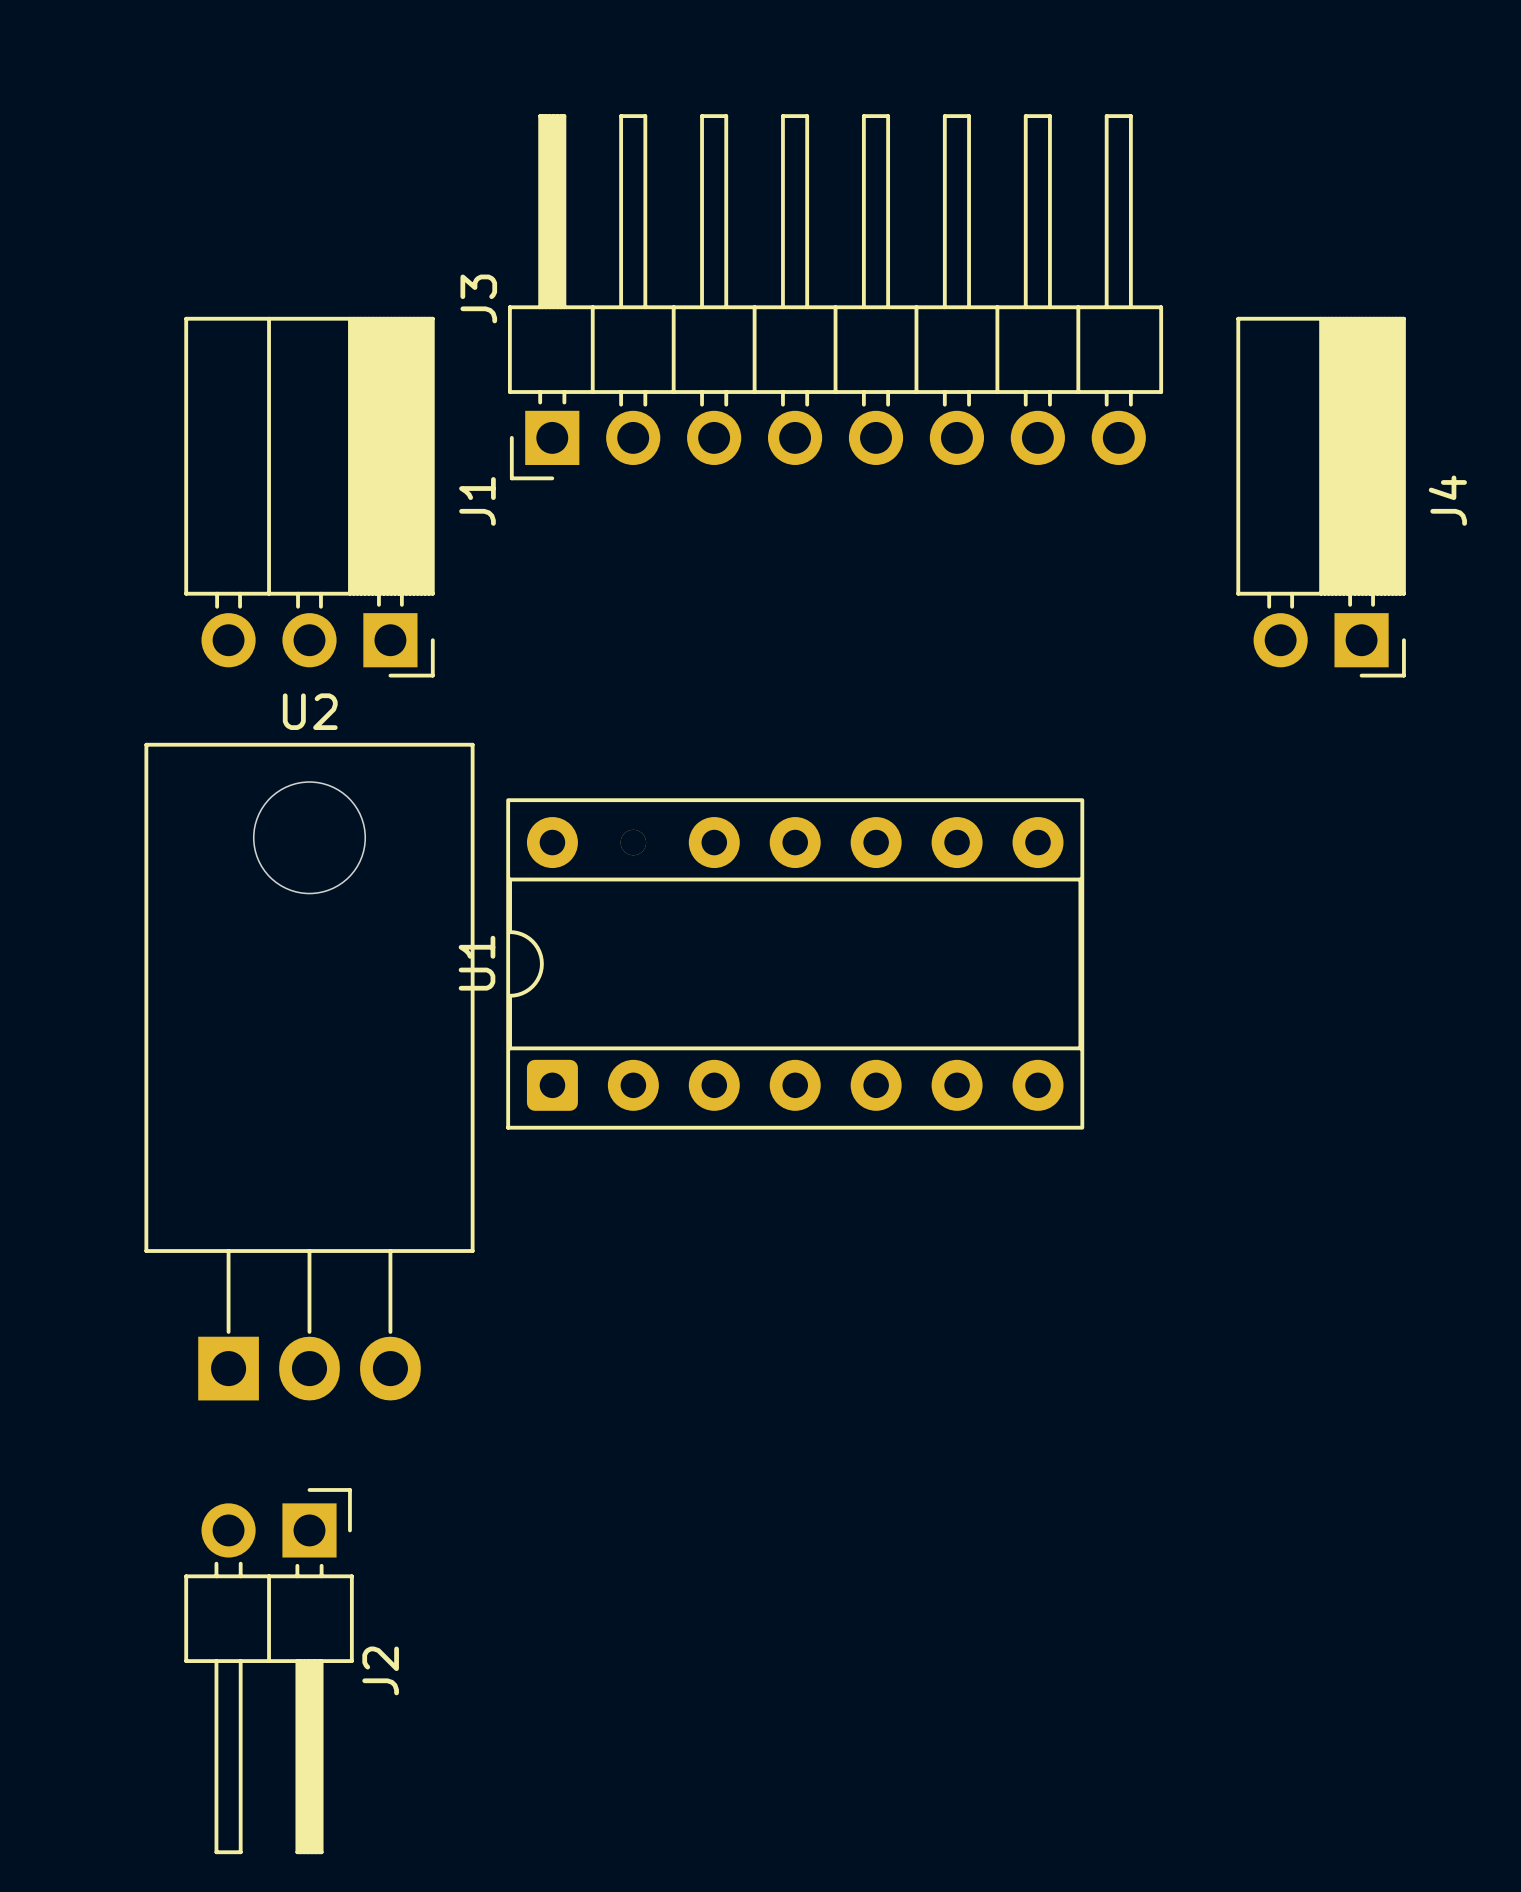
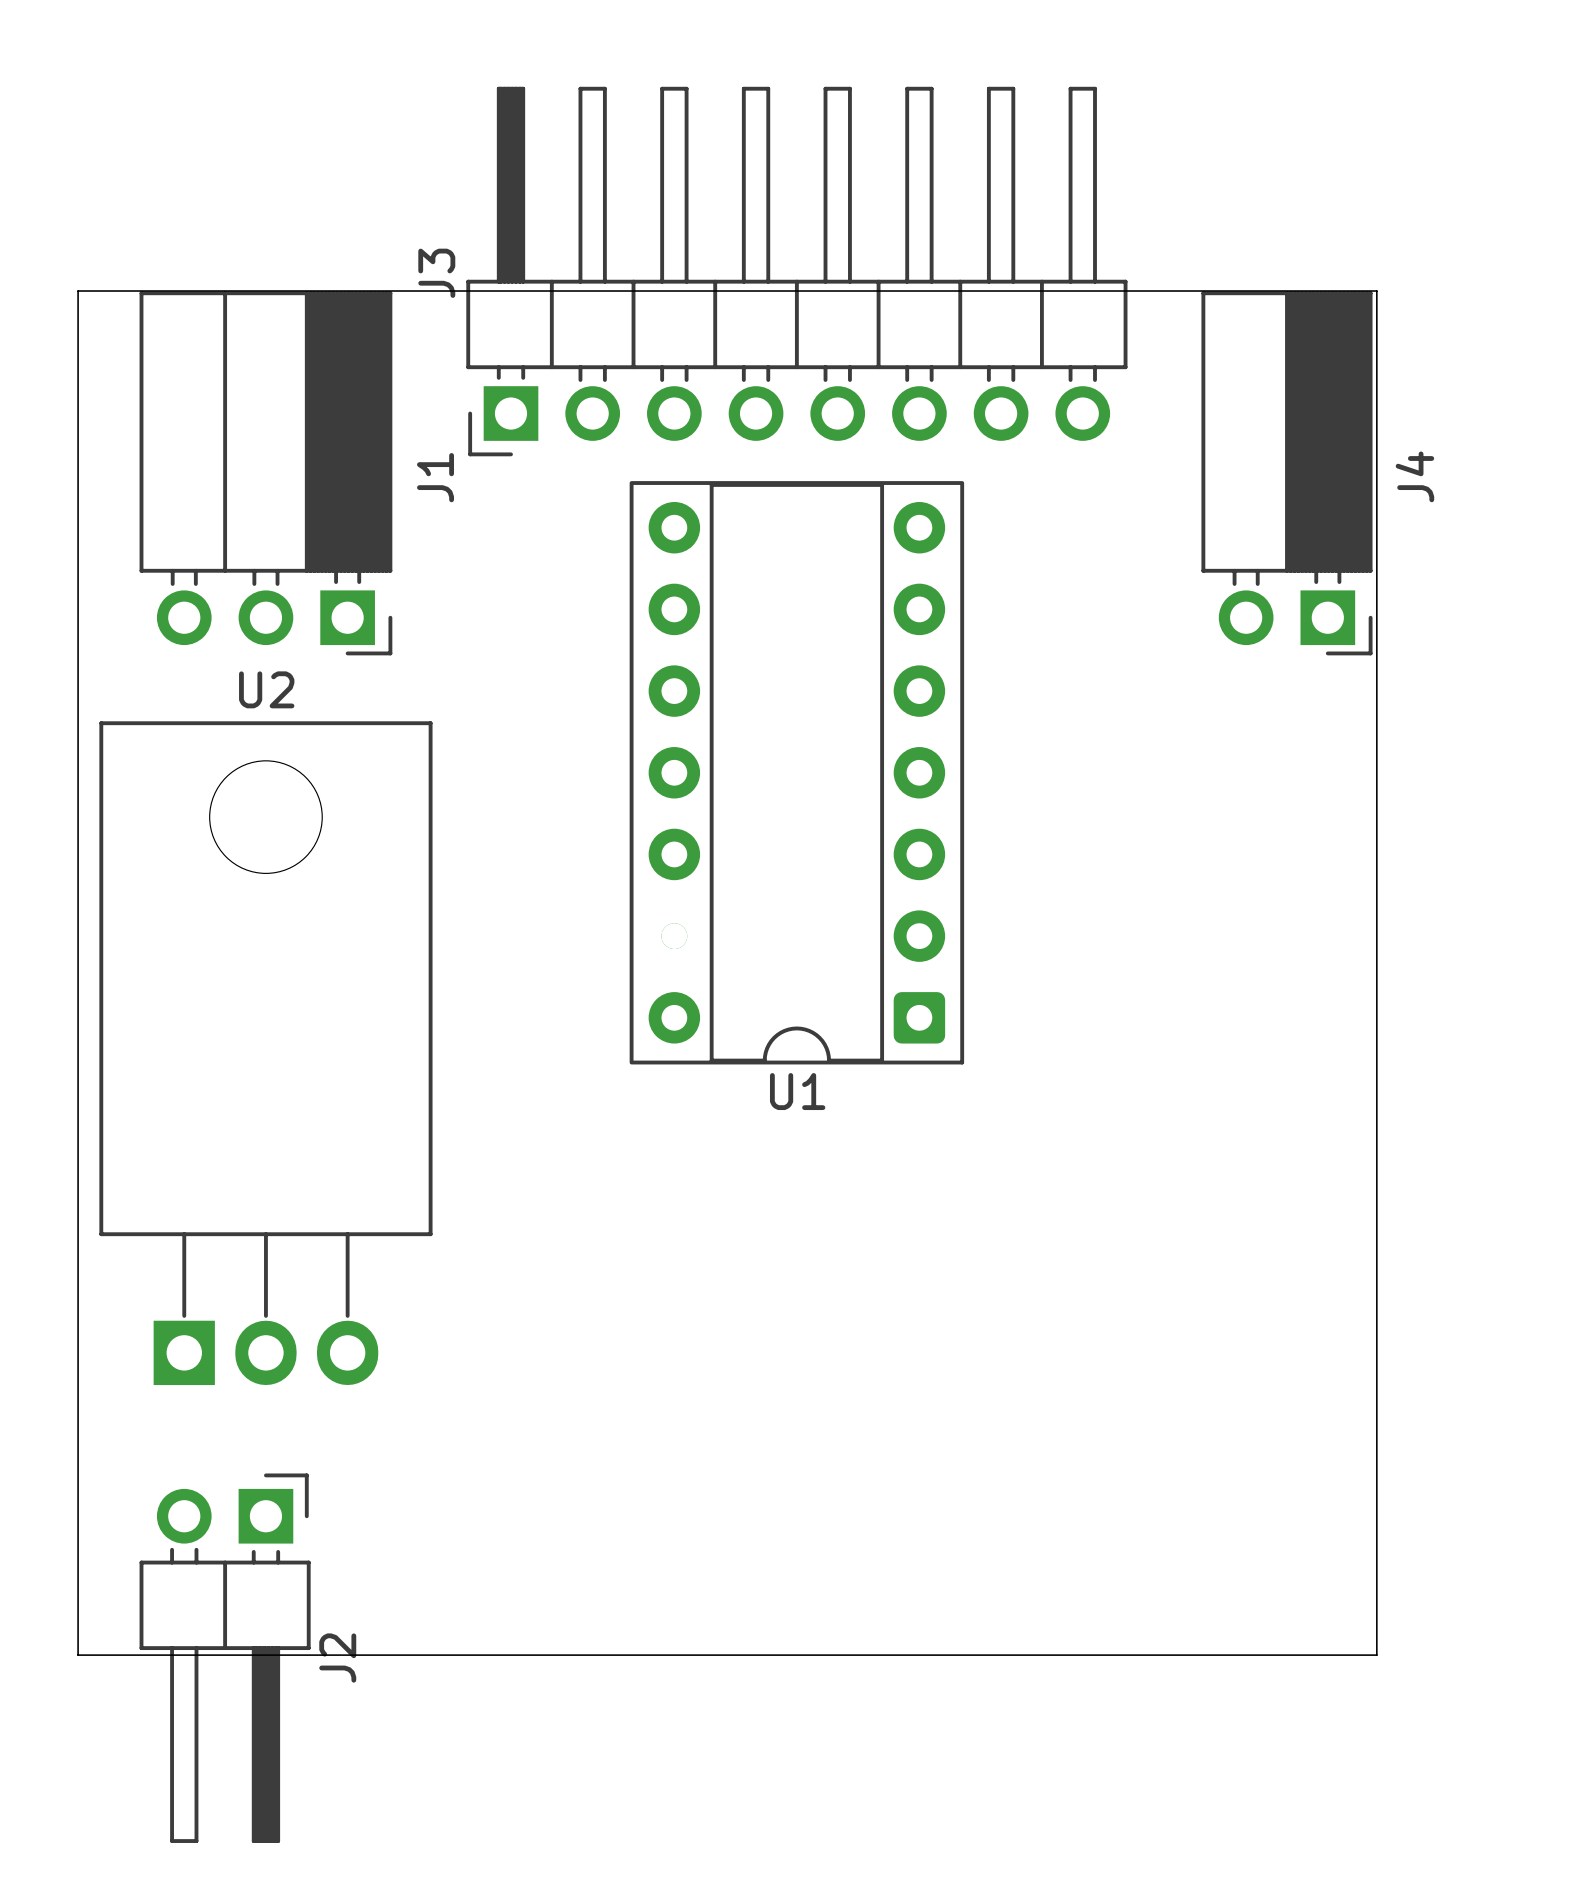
board edge: none -> (78, 291) (1376, 291) (1376, 1655) (78, 1655) (78, 291)
U1 rotation: 0° (795, 963) -> 90° counterclockwise (796, 772)

